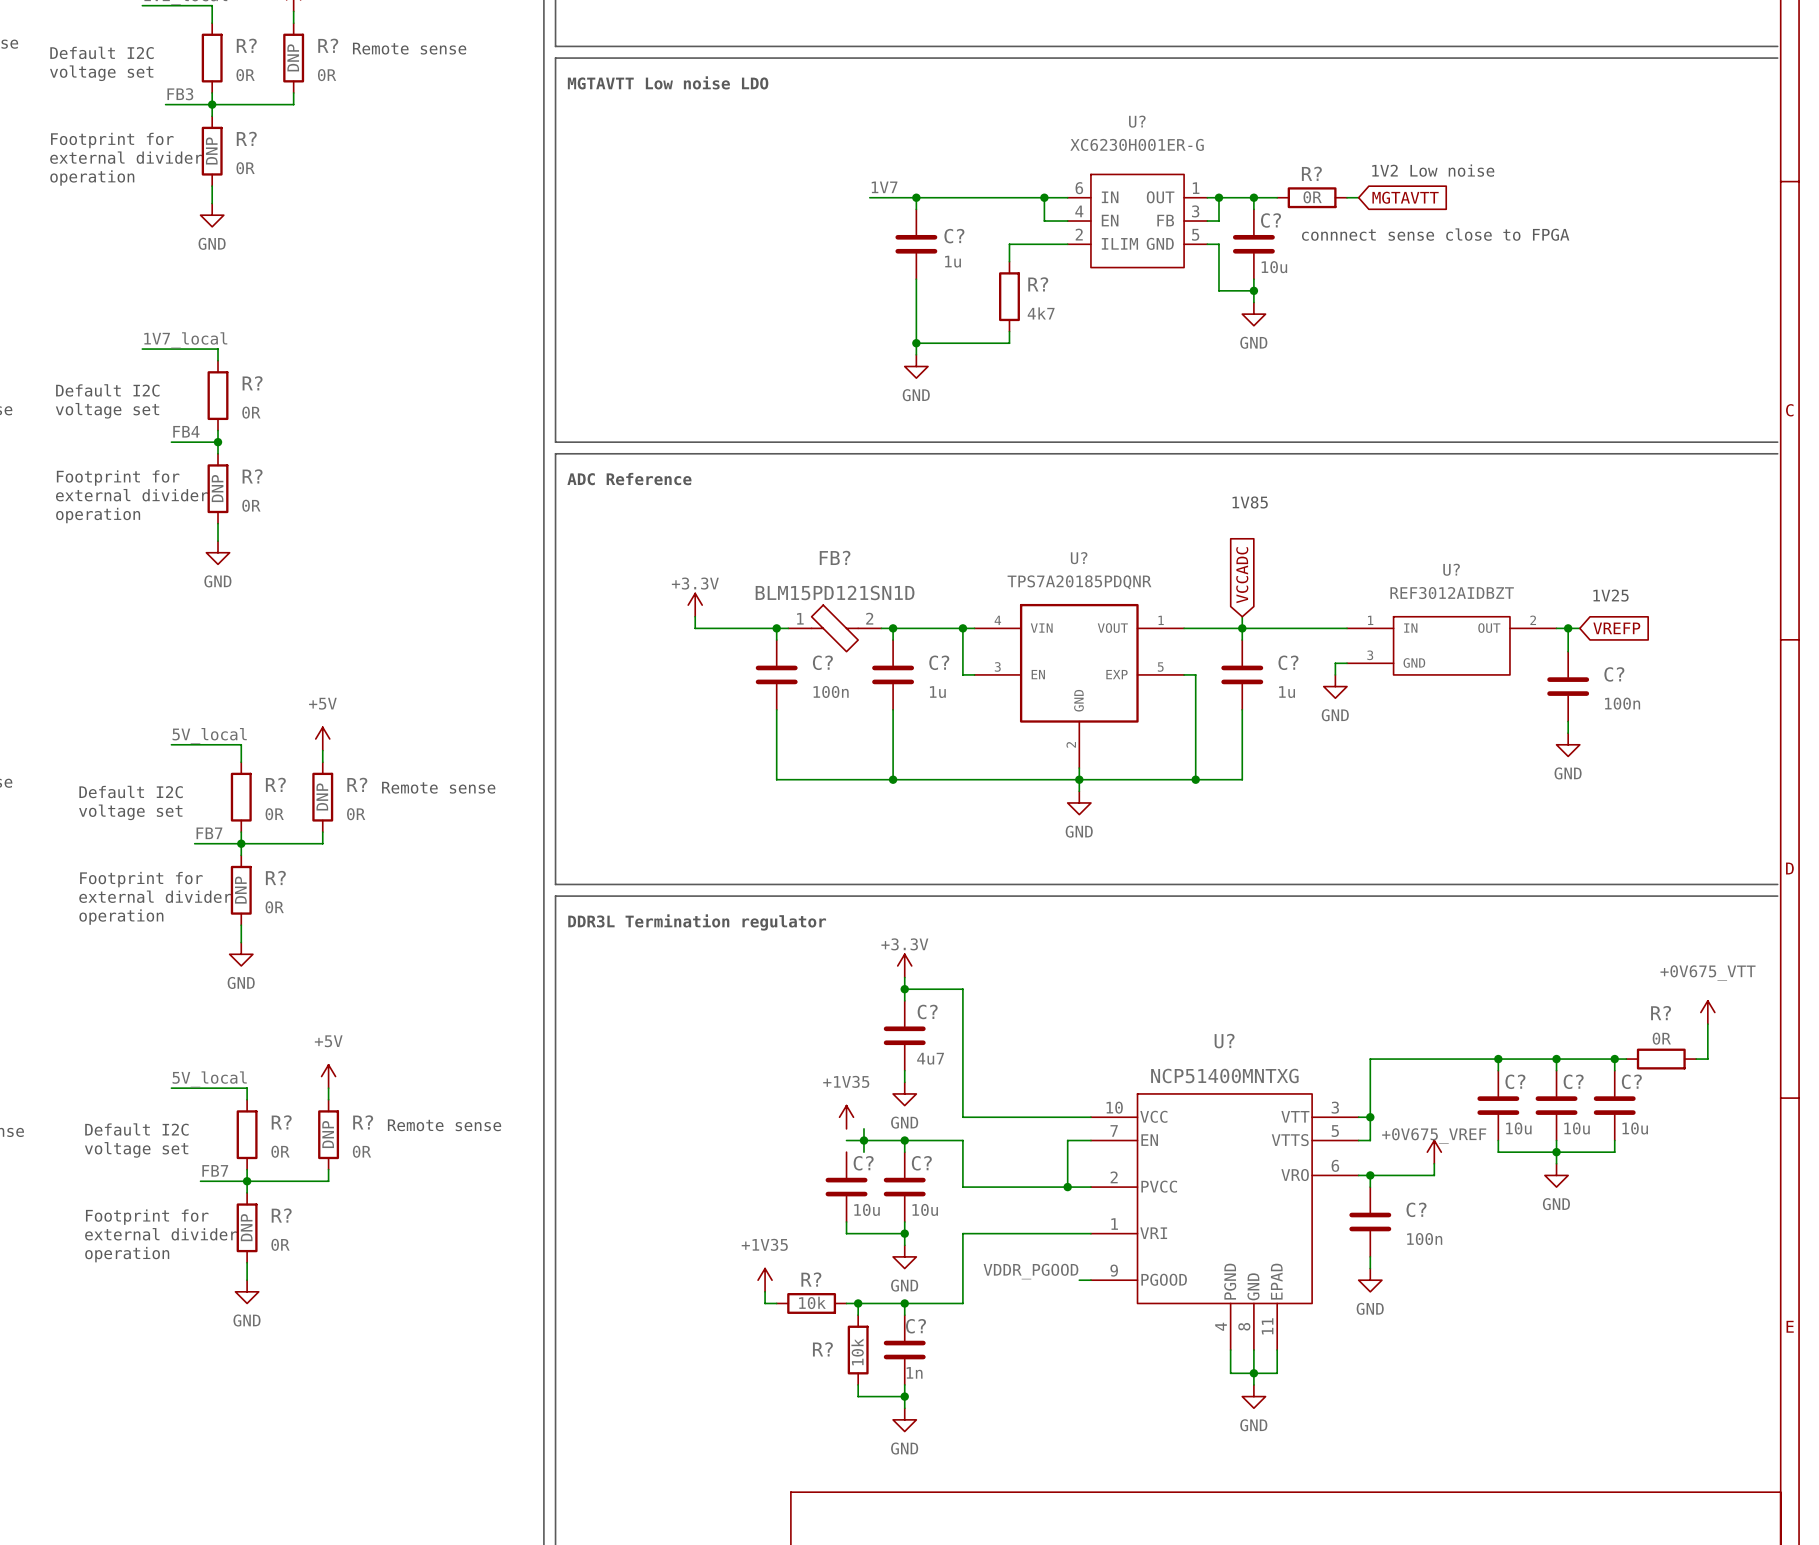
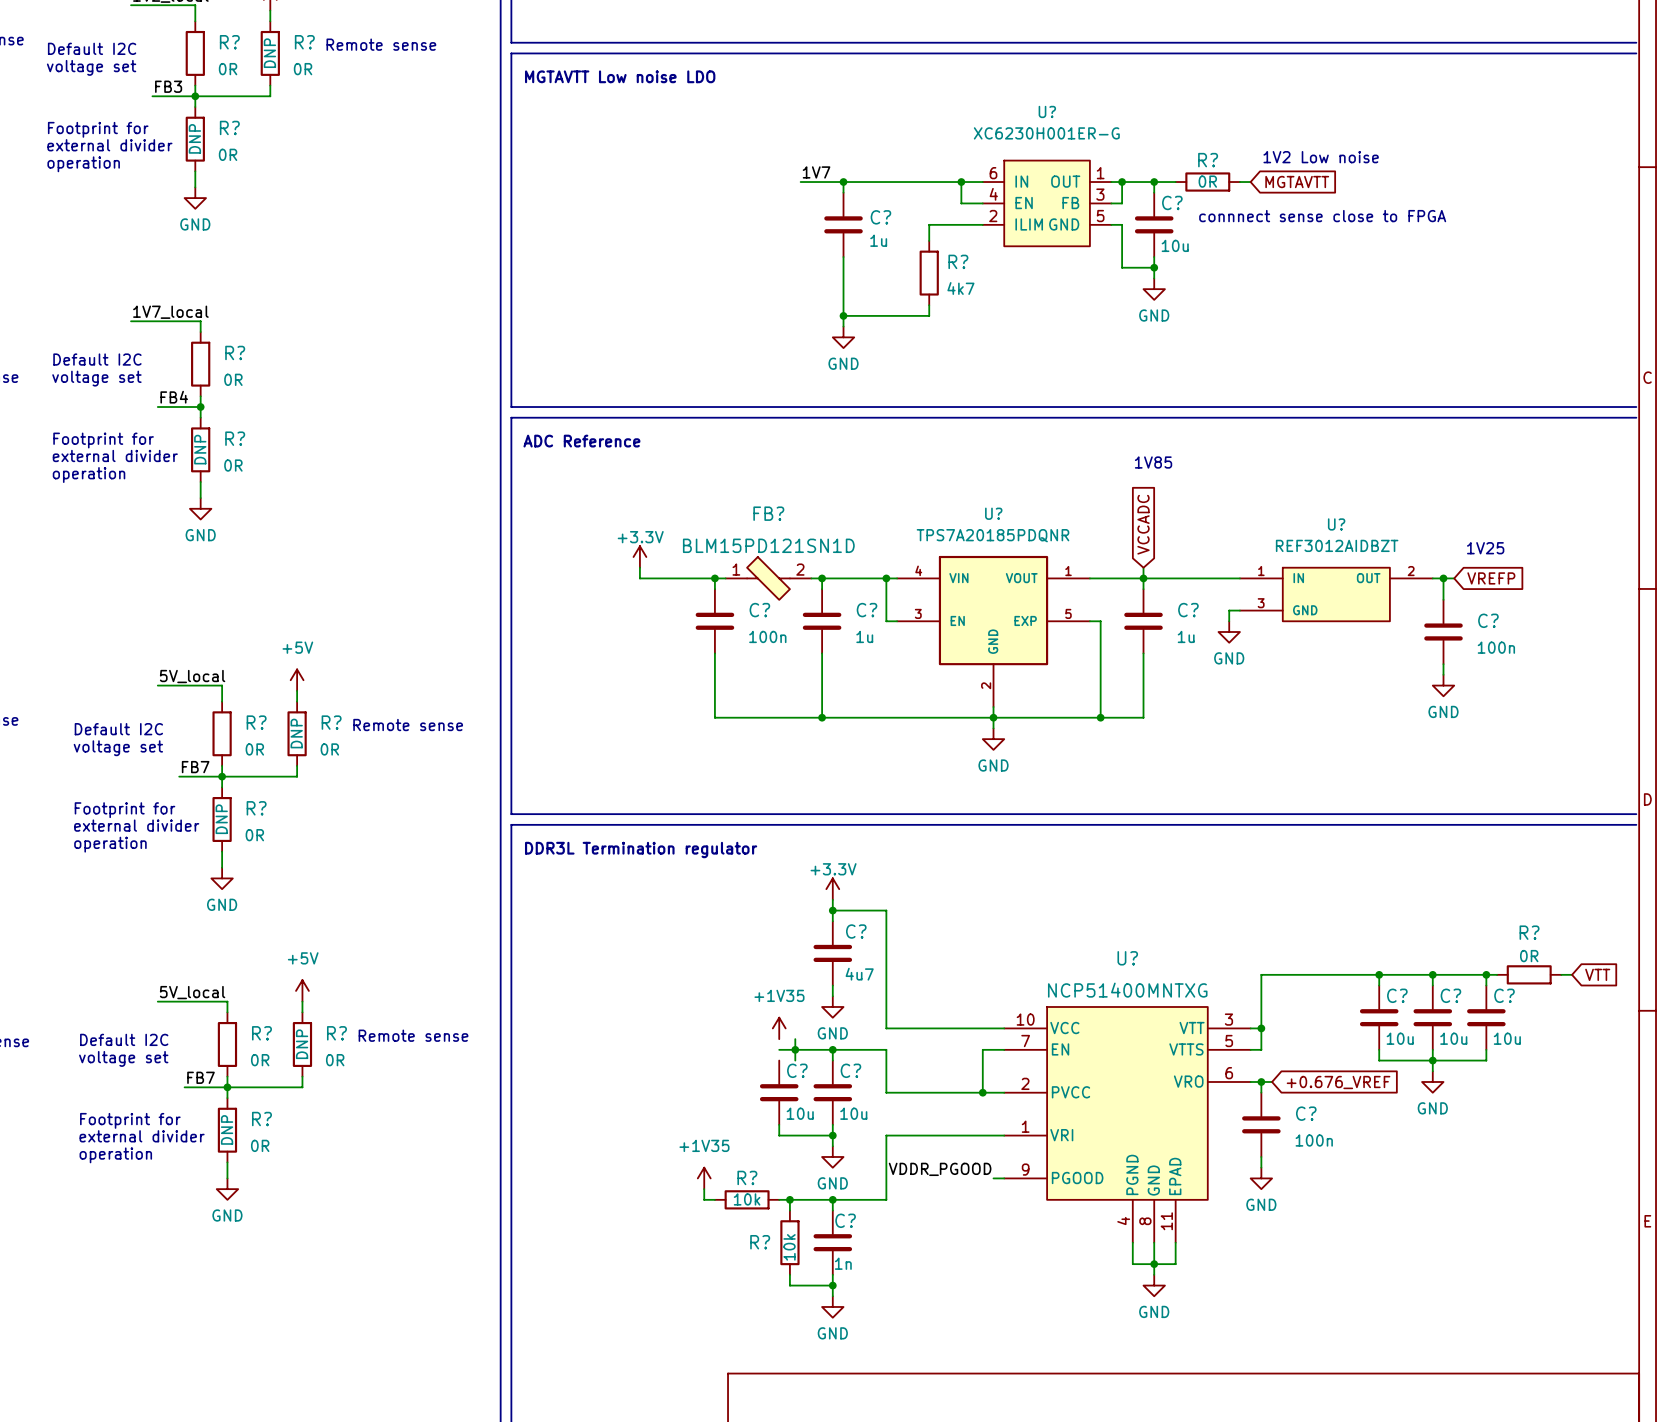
power symbol: +0V675_VTT (1707, 1012) -> none
wire: (1707, 1024) (1707, 1059) -> none
global label: none -> VTT (1597, 974)
power symbol: +0V675_VREF (1434, 1152) -> none
wire: (1434, 1163) (1434, 1175) (1381, 1175) -> none
global label: none -> +0.676_VREF (1338, 1082)

